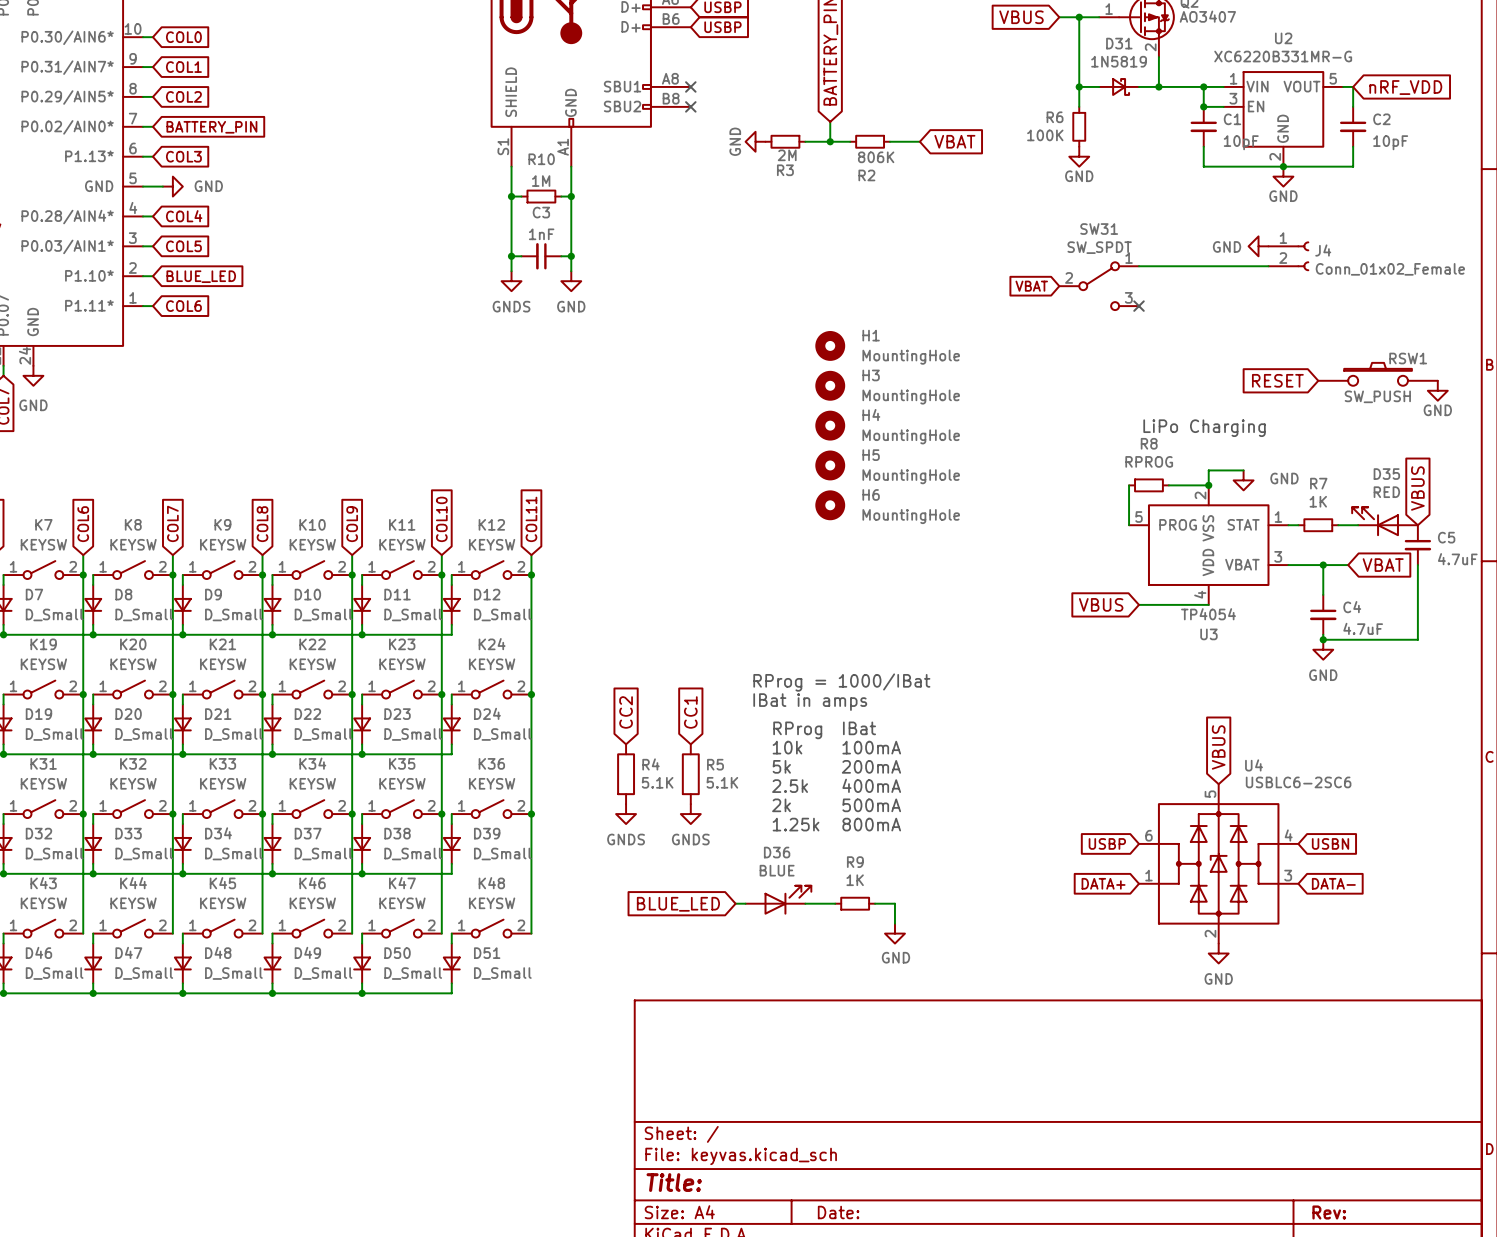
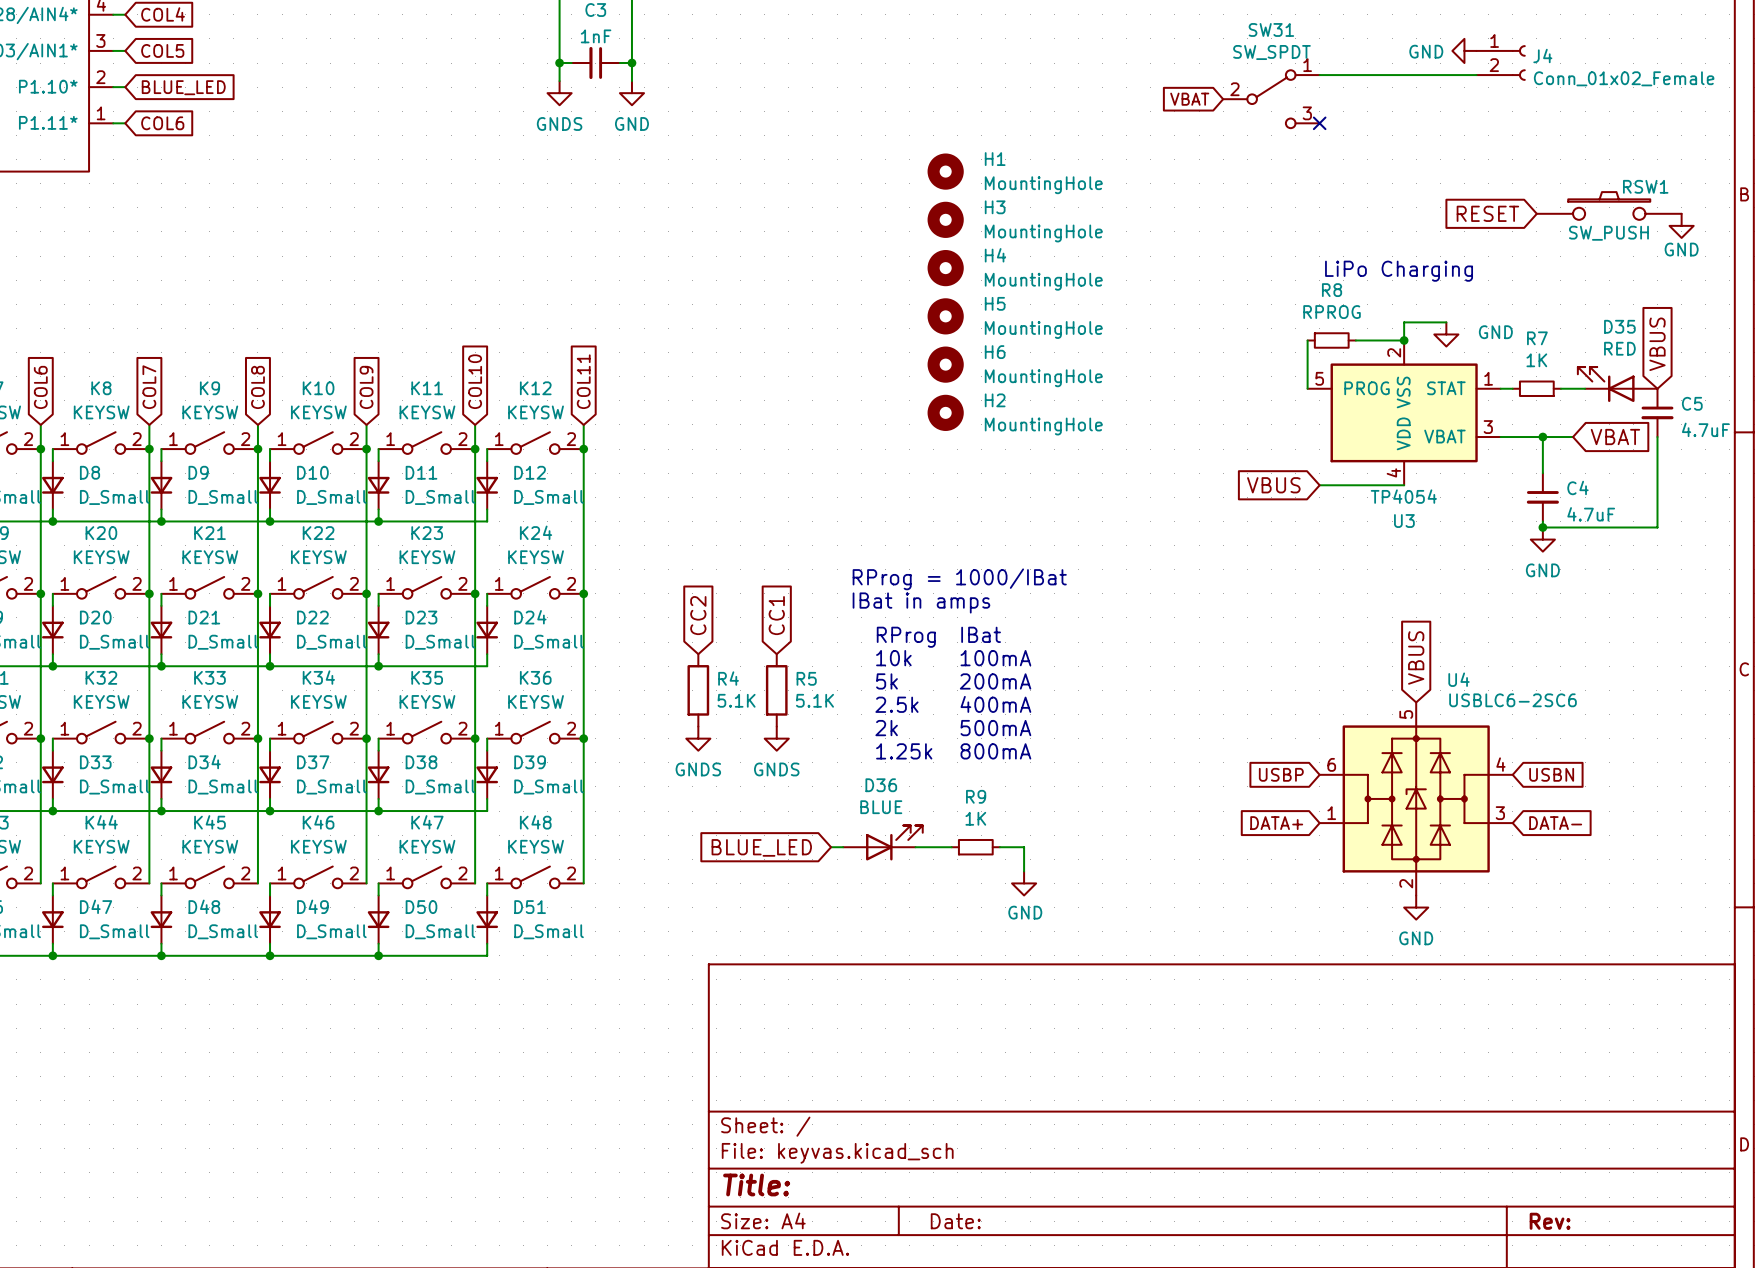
H2: none -> MountingHole (945, 412)

